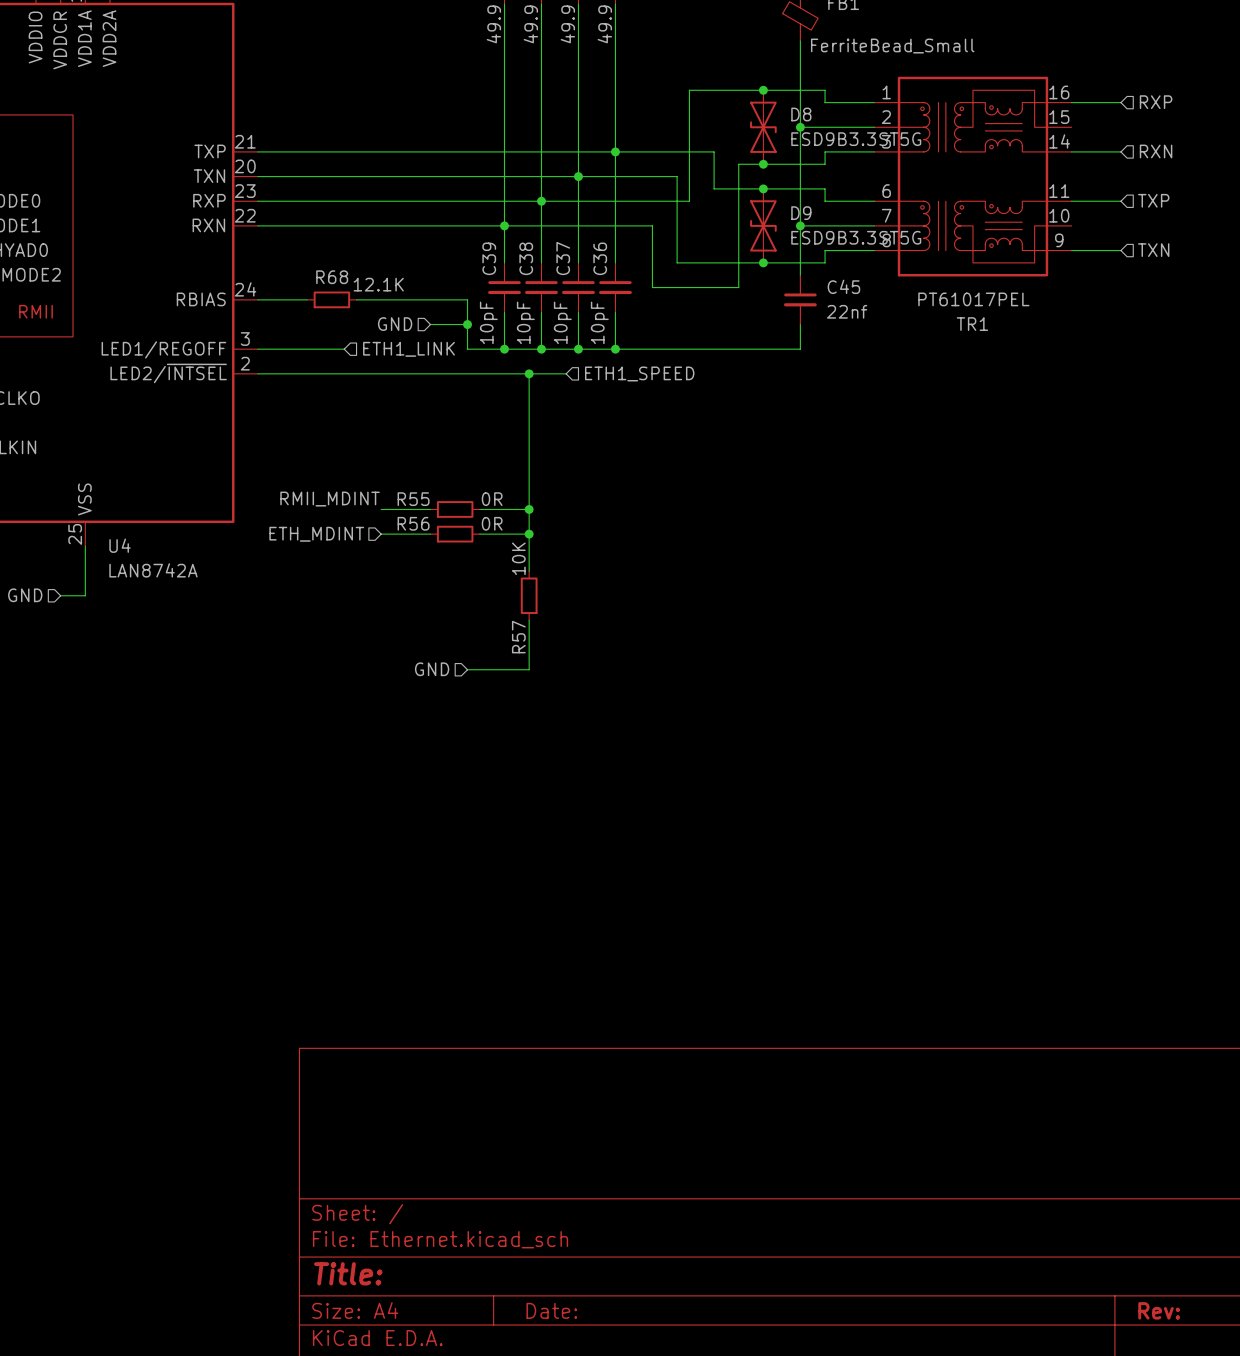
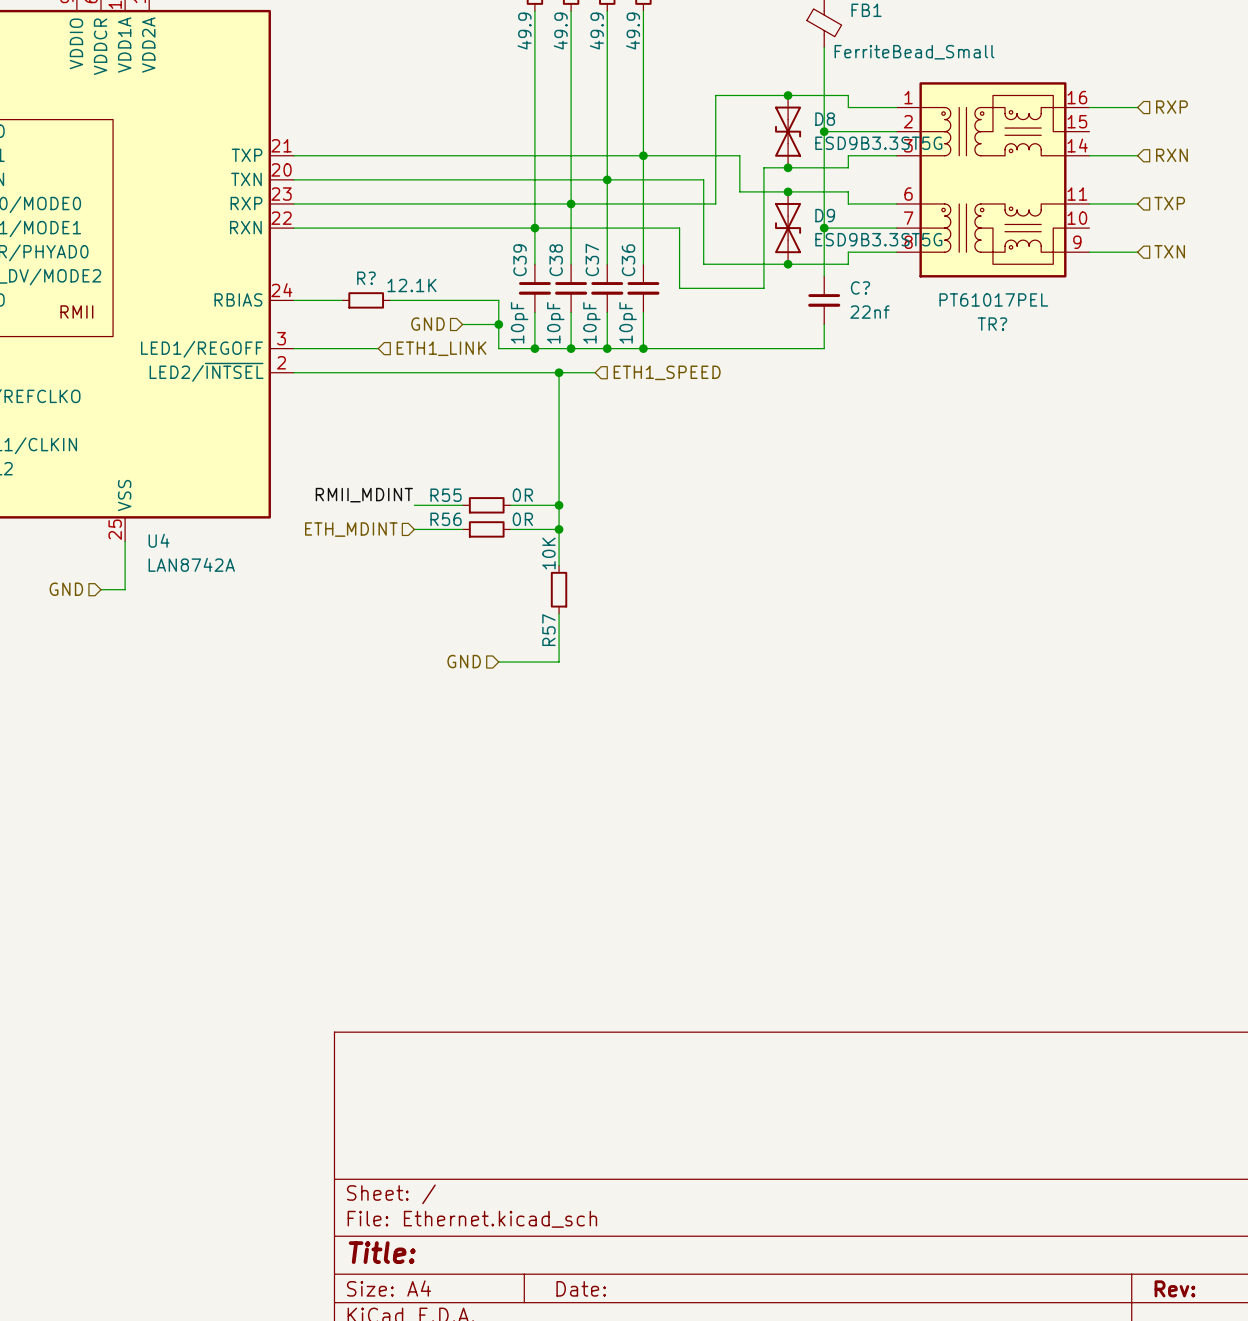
R68 name: R68 (332, 277) -> R? (366, 278)
C45 name: C45 (843, 286) -> C? (860, 287)
TR1 name: TR1 (972, 324) -> TR? (992, 324)

